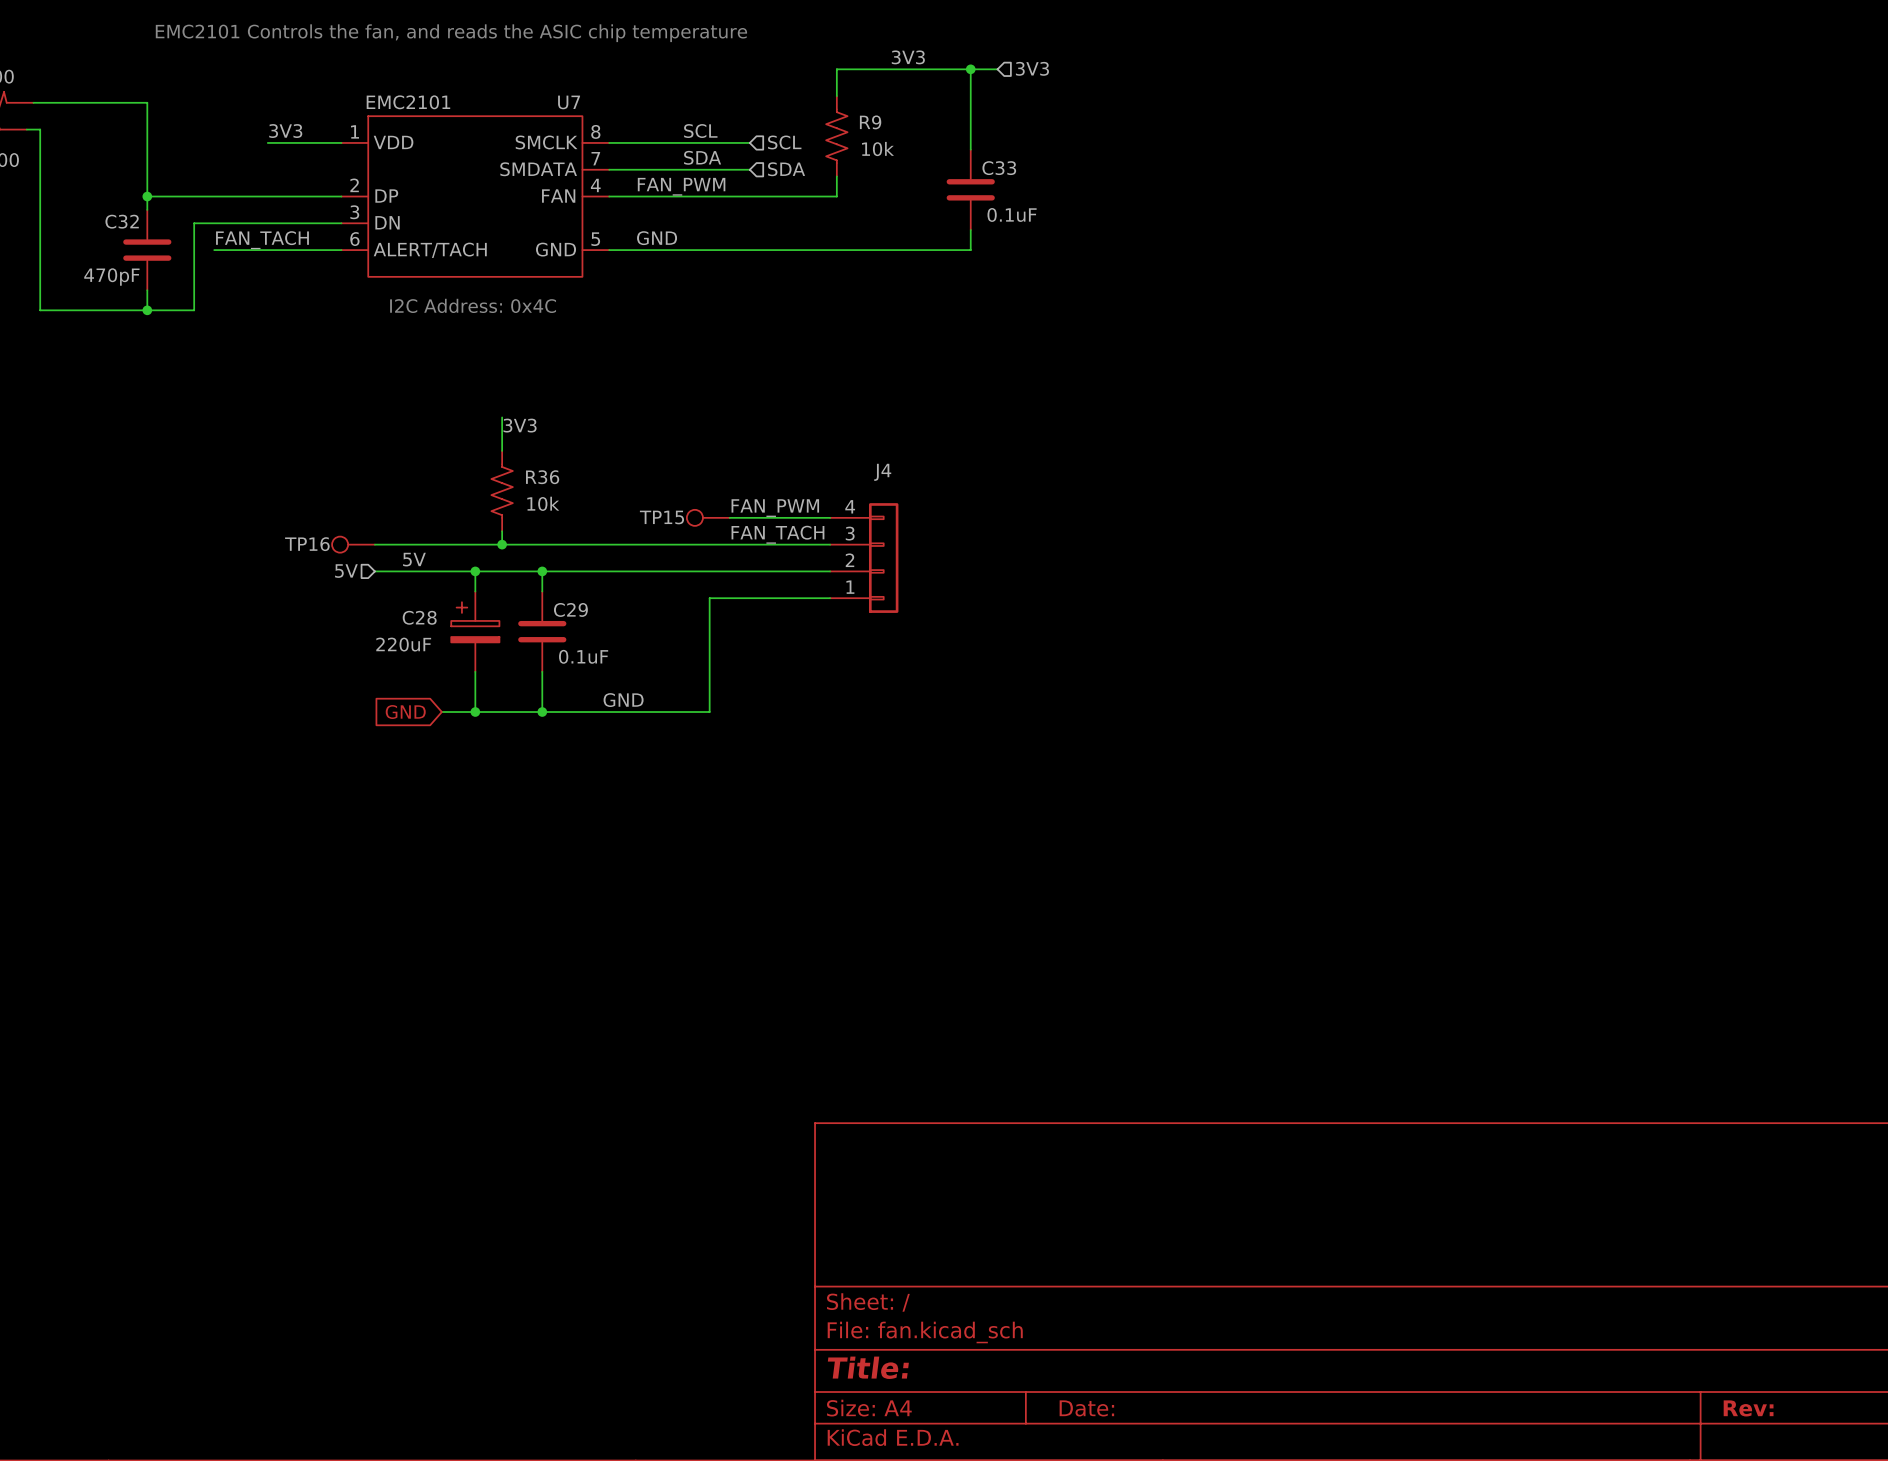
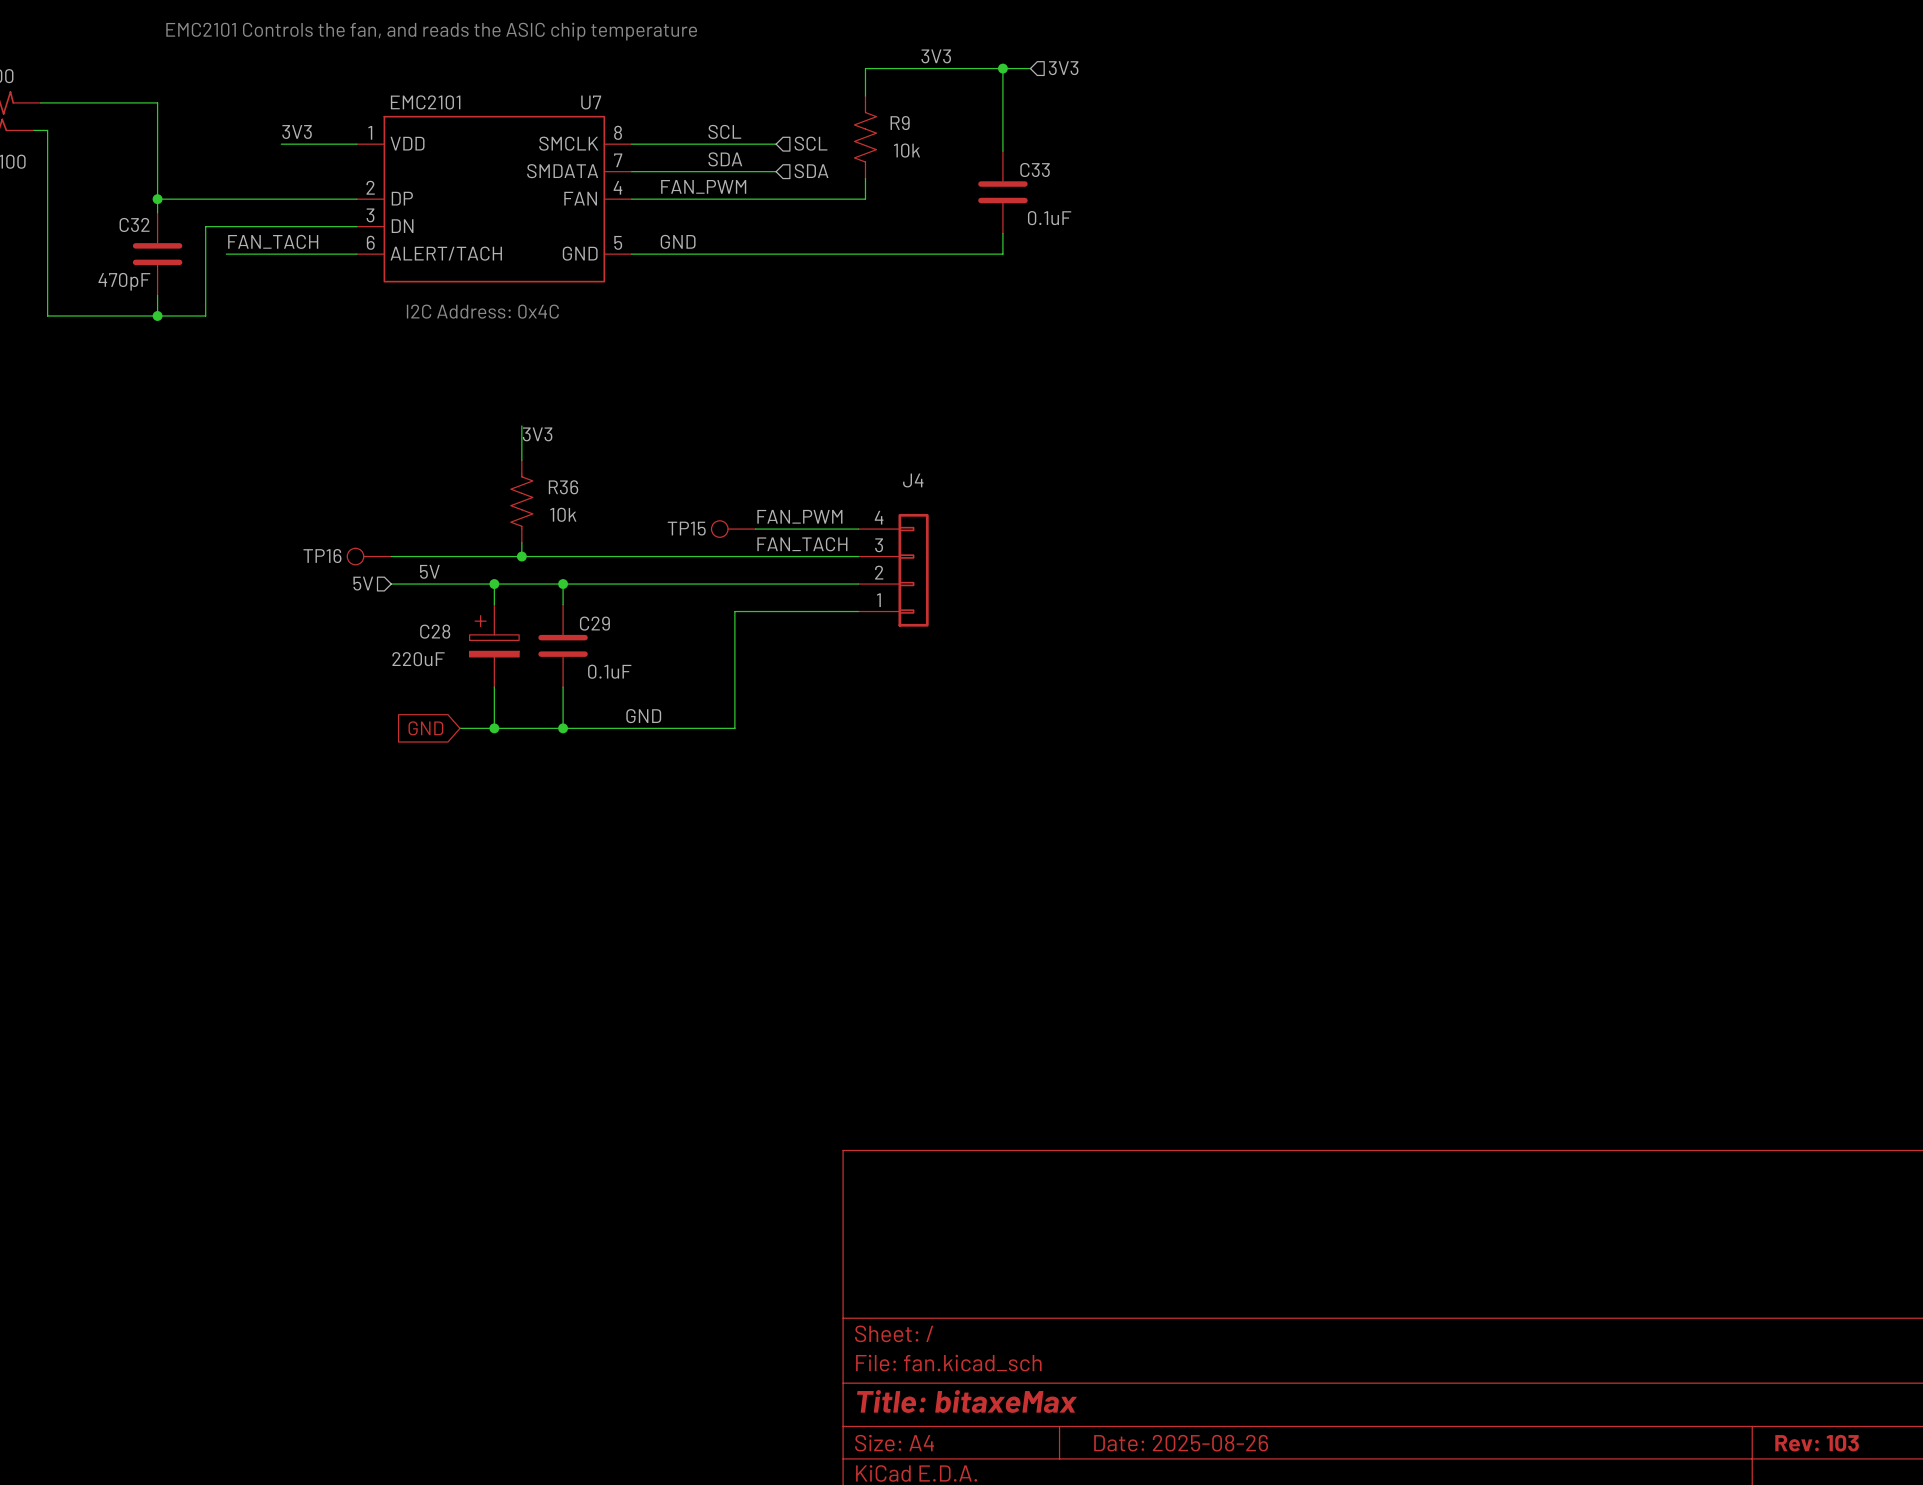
title block: Title: (868, 1367) -> Title: bitaxeMax (966, 1401)
title block: Date: (1086, 1408) -> Date: 2025-08-26 (1181, 1443)
title block: Rev: (1748, 1408) -> Rev: 103 (1817, 1443)

